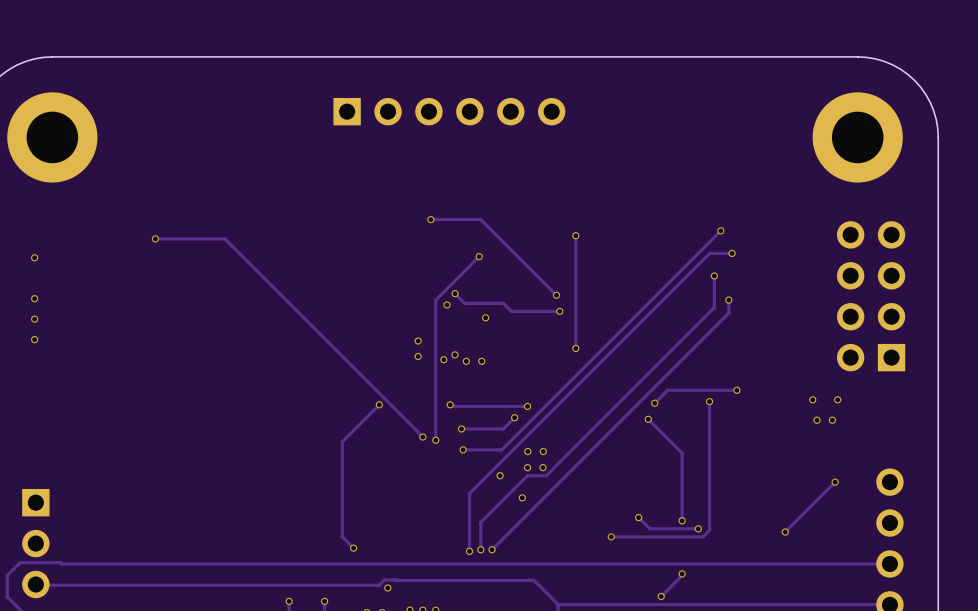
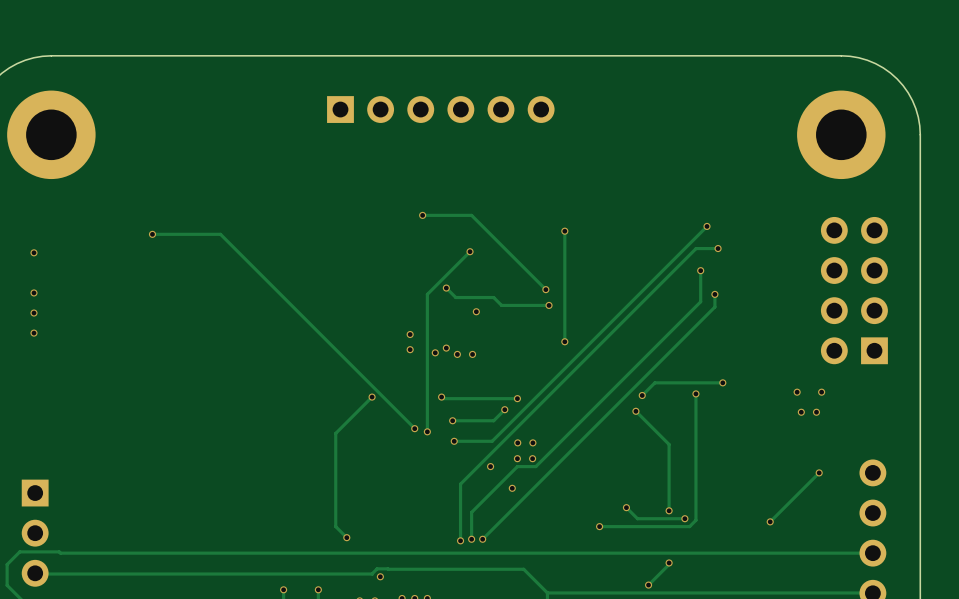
via: (446, 304) -> none

